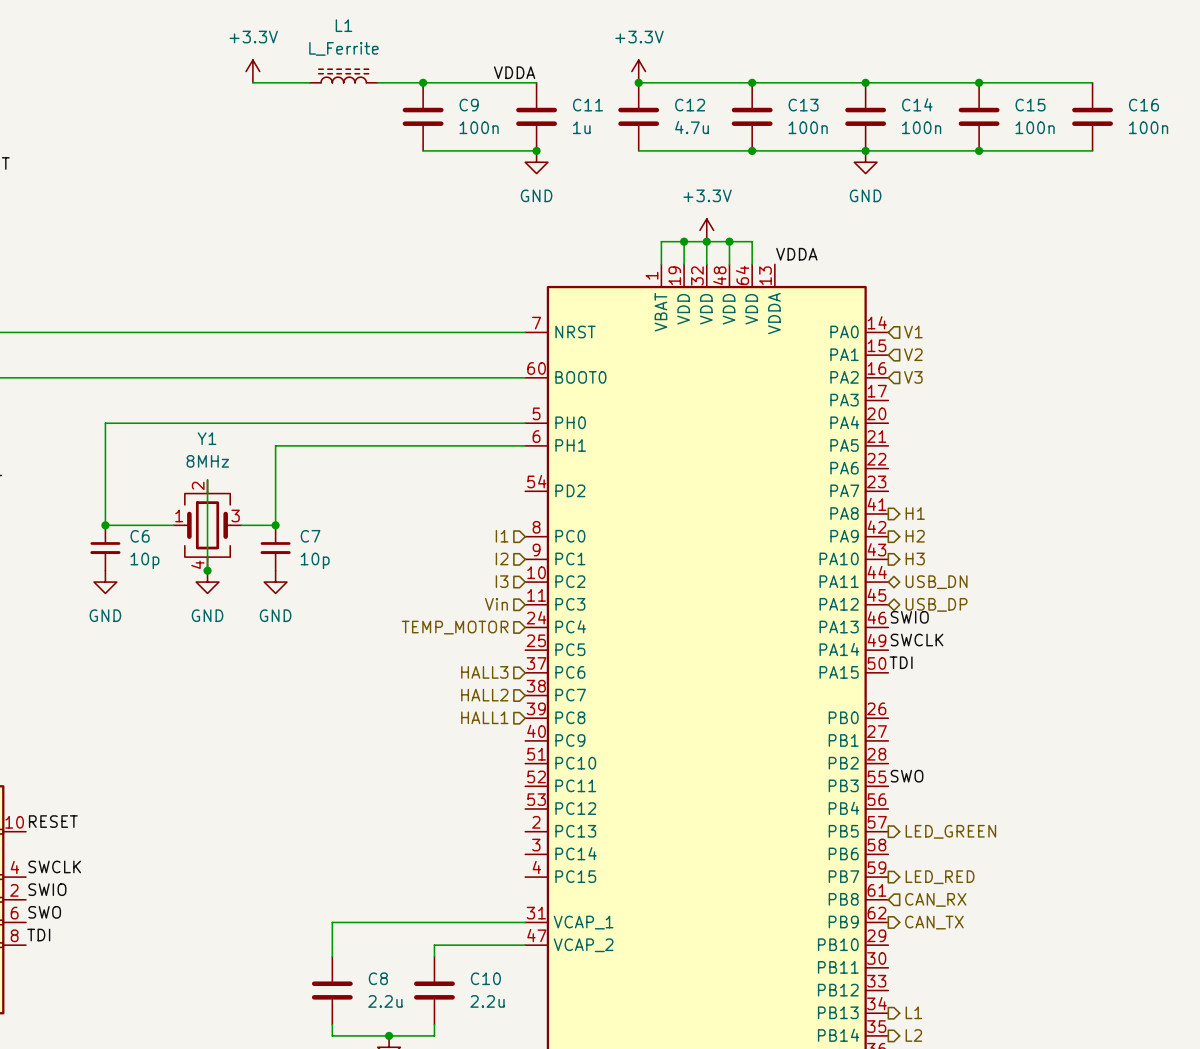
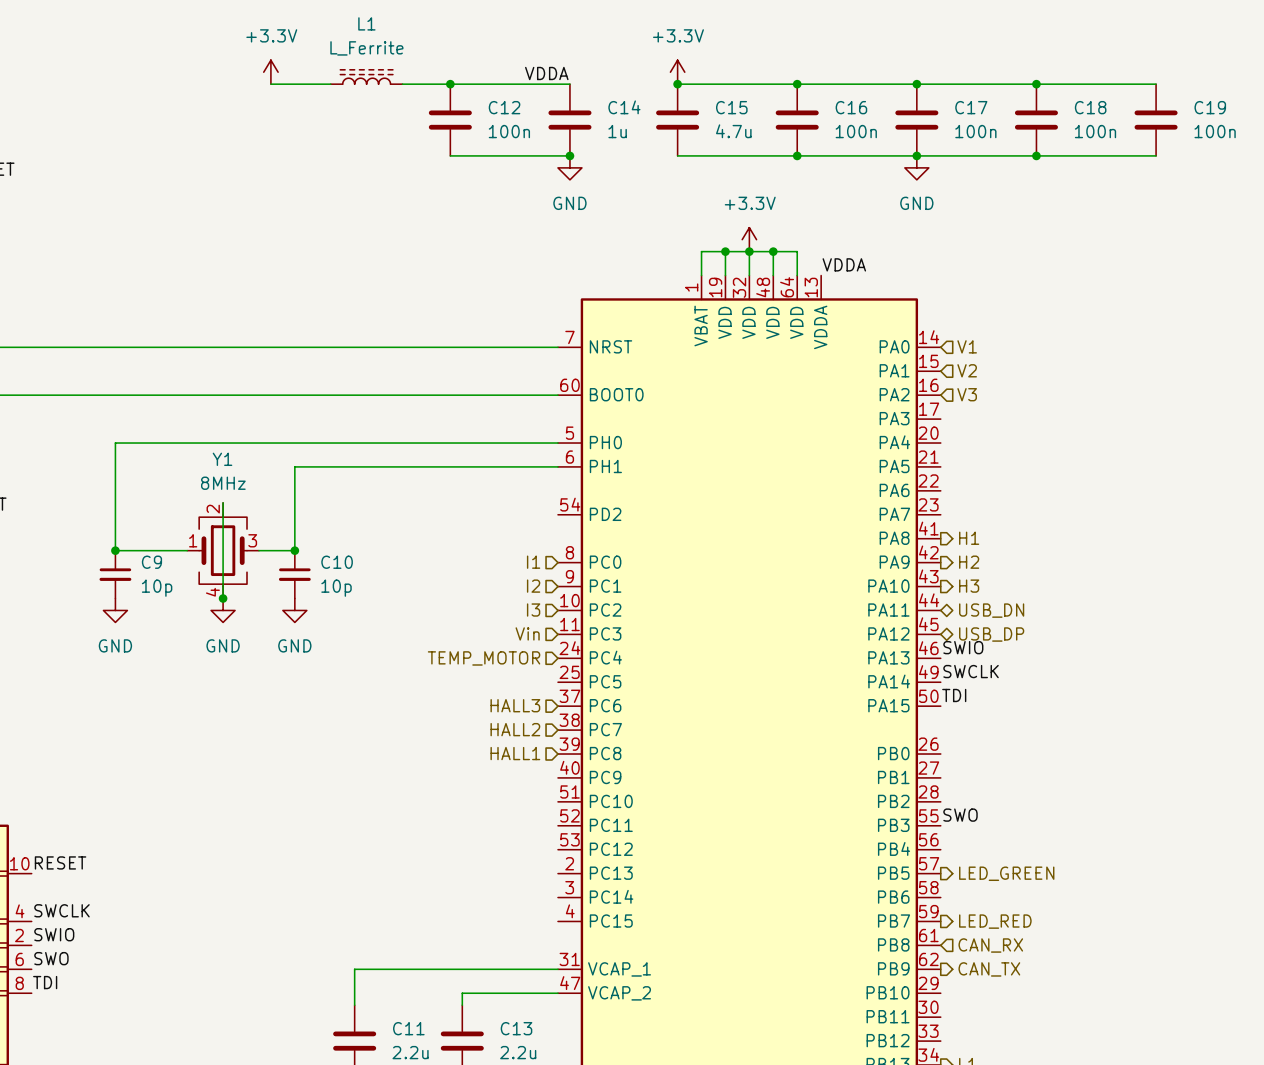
C14 name: C14 (917, 104) -> C17 (971, 107)
C9 name: C9 (469, 105) -> C12 (504, 107)
C11 name: C11 (587, 105) -> C14 (624, 107)
C12 name: C12 (690, 105) -> C15 (731, 107)
C13 name: C13 (803, 105) -> C16 (851, 107)
C15 name: C15 (1030, 105) -> C18 (1090, 107)
C16 name: C16 (1143, 105) -> C19 (1210, 107)
C6 name: C6 (140, 536) -> C9 (151, 562)
C7 name: C7 (310, 536) -> C10 (337, 562)
C8 name: C8 (378, 978) -> C11 (408, 1028)
C10 name: C10 (485, 978) -> C13 (516, 1028)

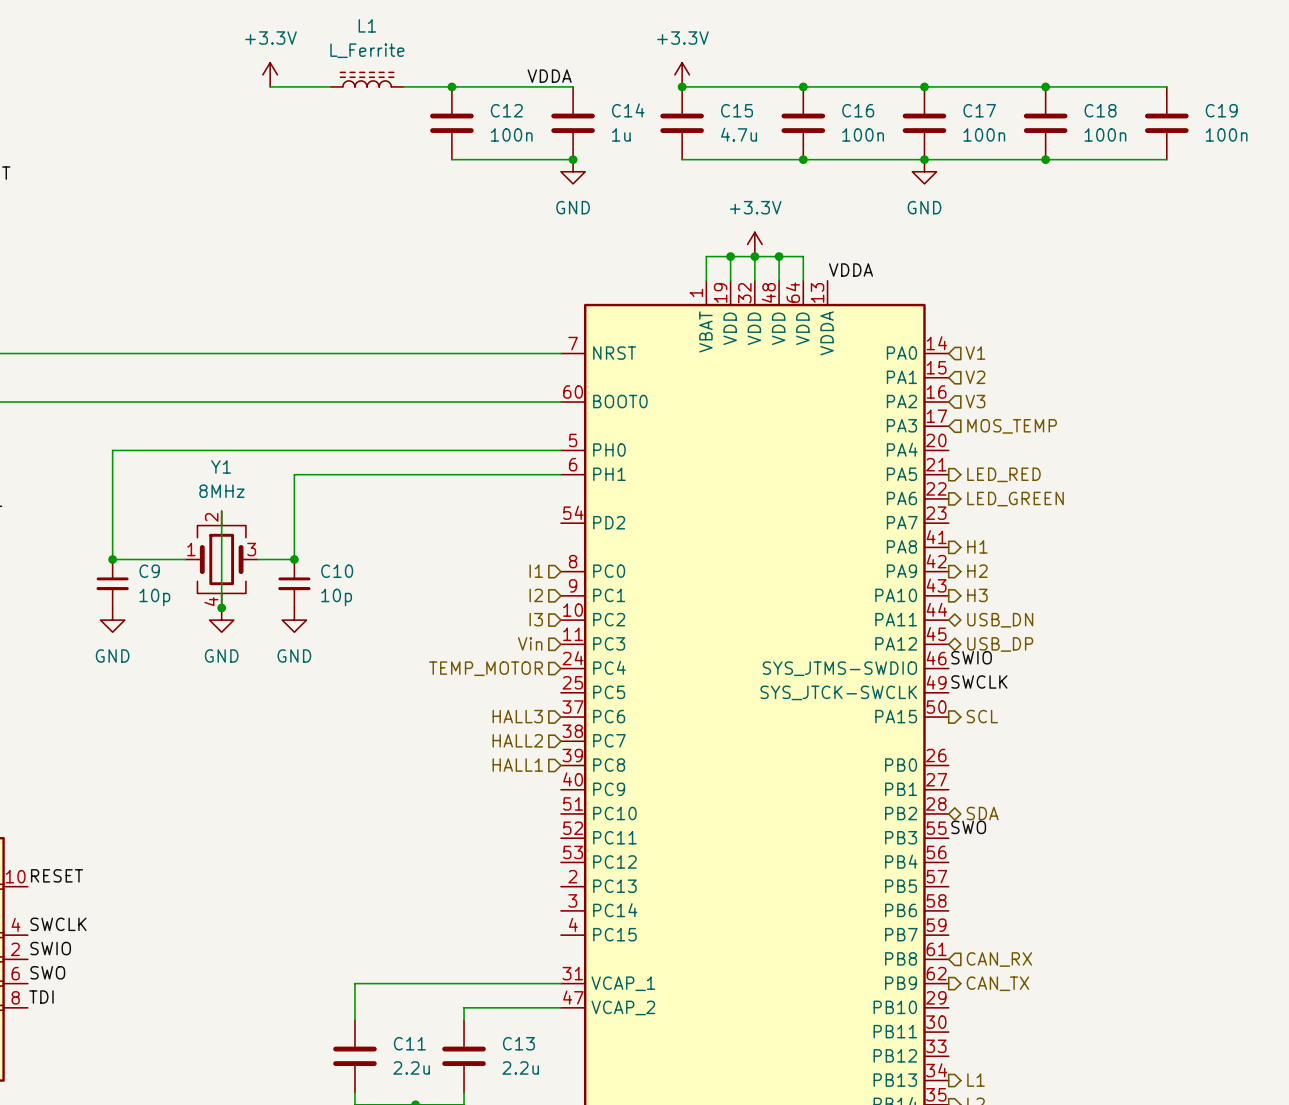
hierarchical label: none -> MOS_TEMP (1012, 426)
hierarchical label: none -> LED_RED (1004, 474)
hierarchical label: none -> LED_GREEN (1015, 499)
part pin name: PA13 (888, 657) -> SYS_JTMS-SWDIO (839, 668)
part pin name: PA14 (889, 681) -> SYS_JTCK-SWCLK (838, 692)
label: TDI (954, 695) -> none
hierarchical label: none -> SCL (982, 716)
hierarchical label: none -> SDA (982, 813)
hierarchical label: LED_GREEN (1006, 873) -> none
hierarchical label: LED_RED (995, 921) -> none

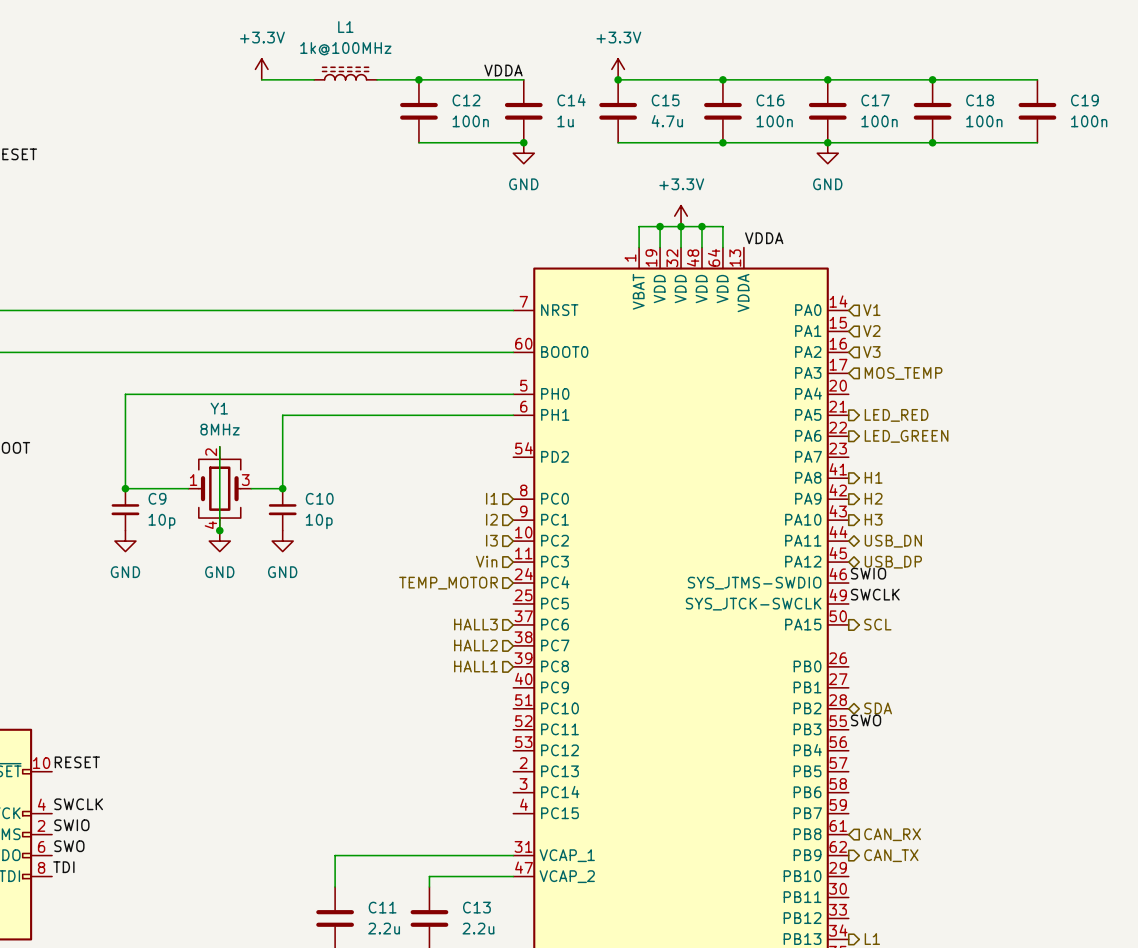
L1 value: L_Ferrite (367, 50) -> 1k@100MHz (345, 48)

